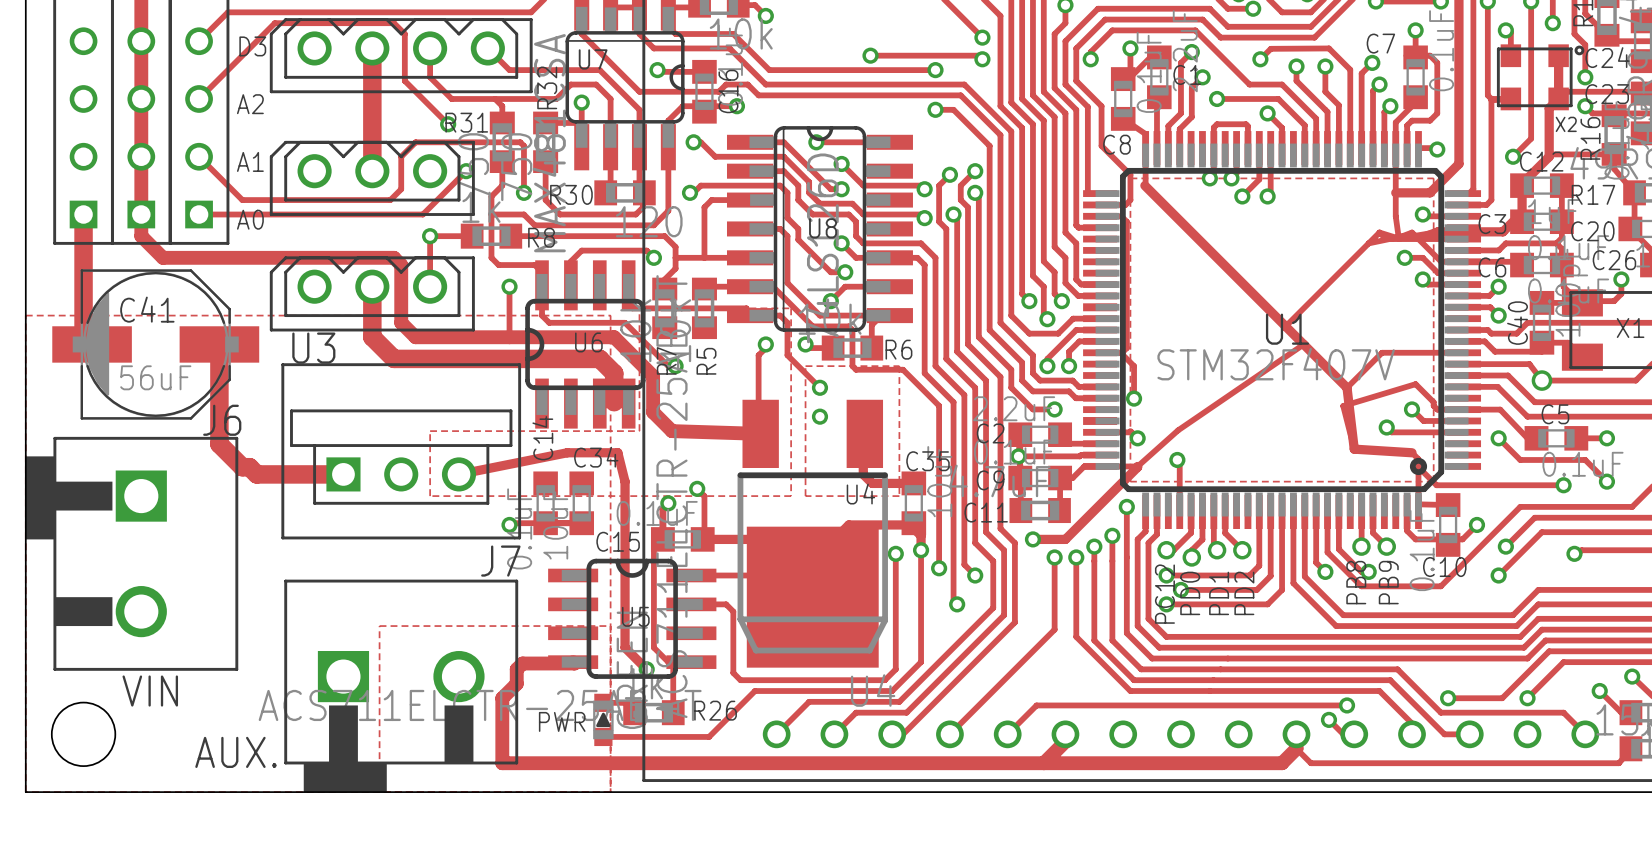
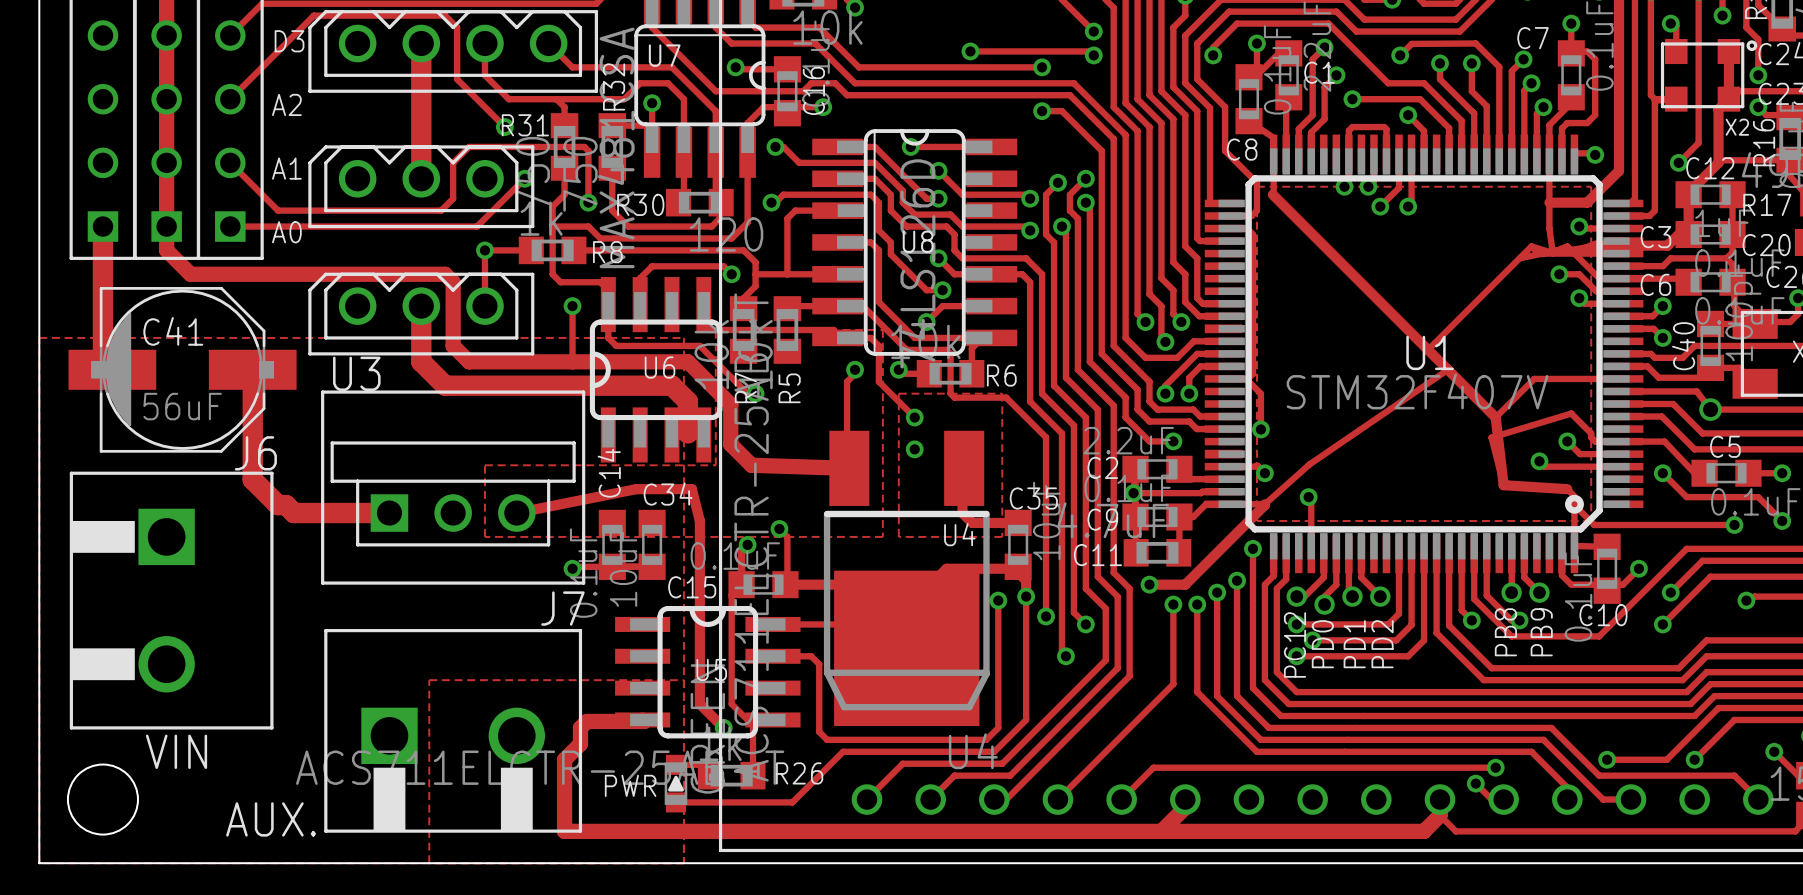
drawing: [25, 456, 55, 540] -> none
drawing: [303, 763, 387, 793] -> none

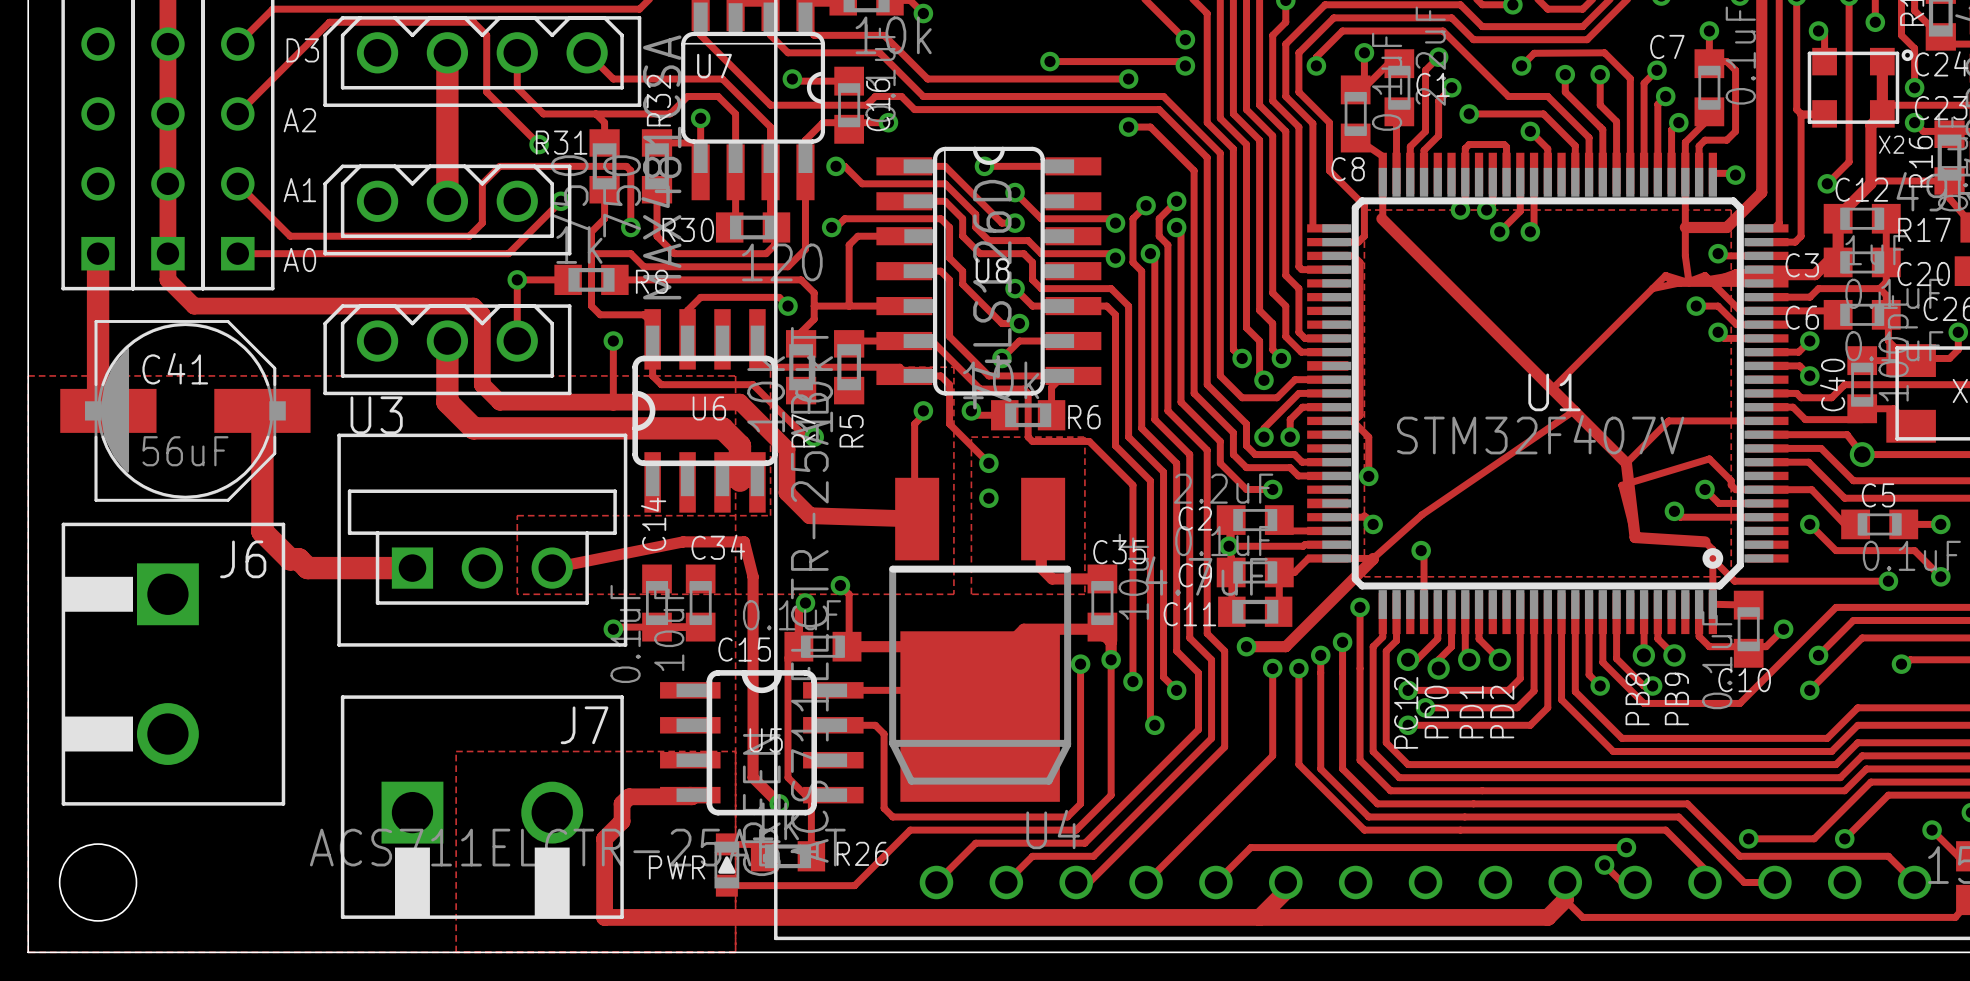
J6 name position: J6 (255, 453) -> J6 (243, 559)
text: U4 (959, 534) -> none
J7 name position: J7 (562, 608) -> J7 (584, 725)
text: VIN (176, 751) -> none
text: AUX. (271, 819) -> none

